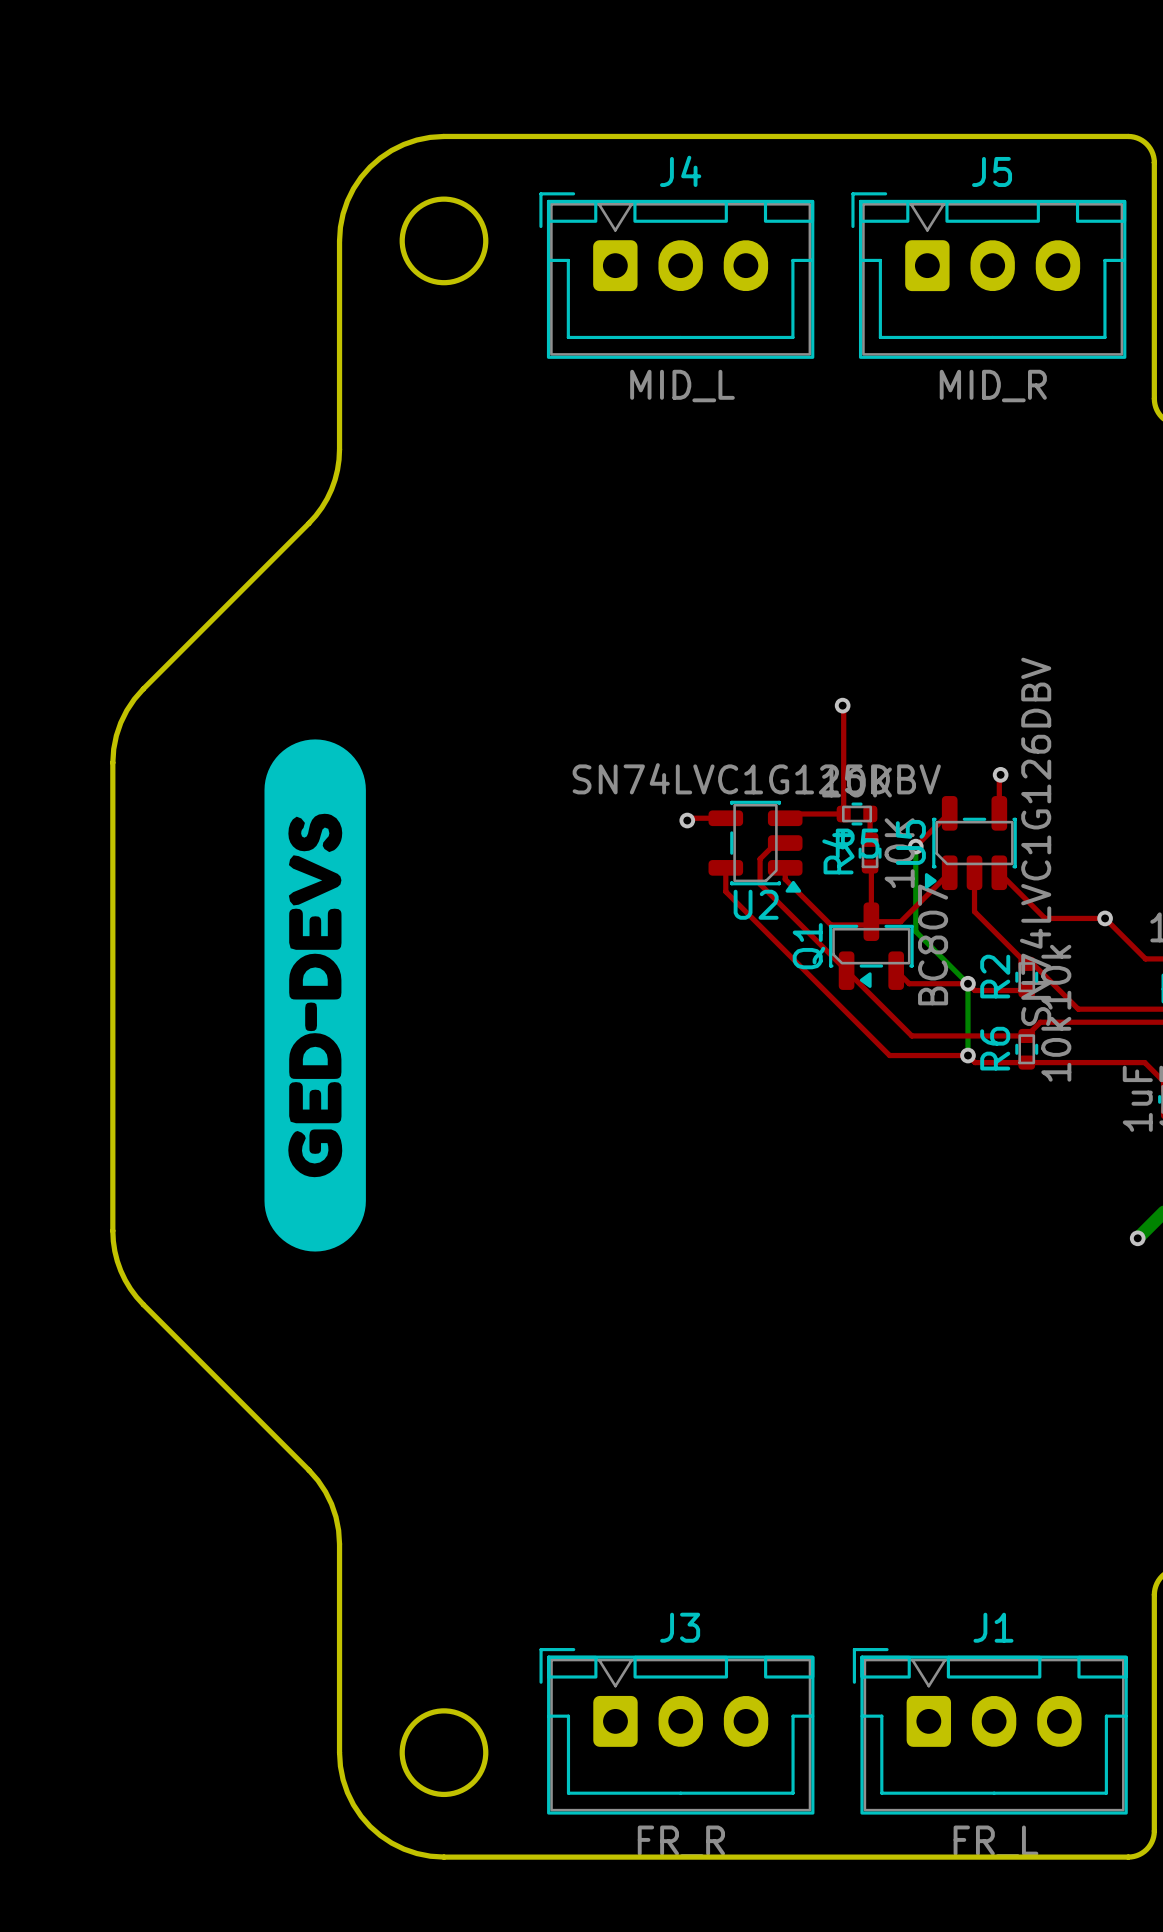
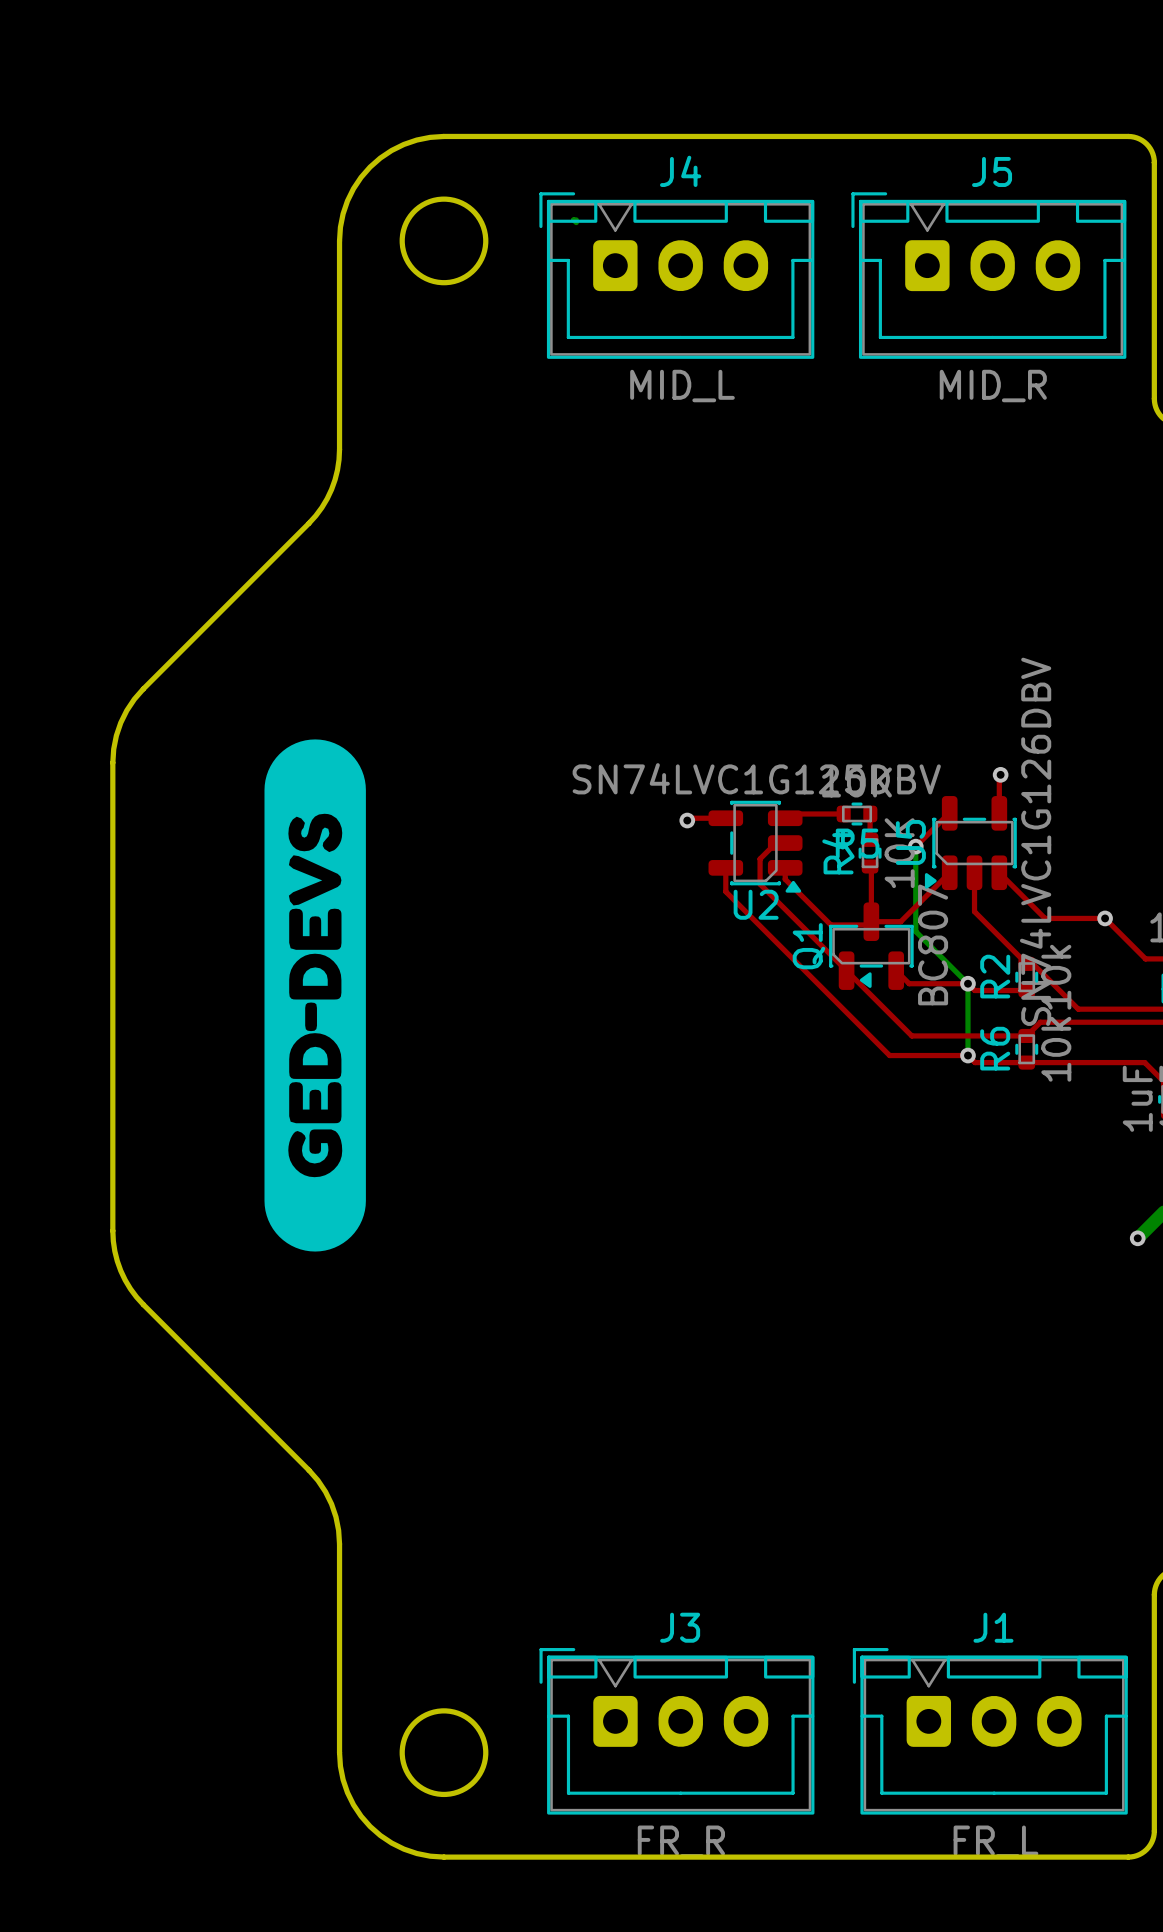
bottom track: none -> (576, 219) (573, 219) (576, 222)
top track: (842, 705) (843, 814) -> none
via: (842, 705) -> none

